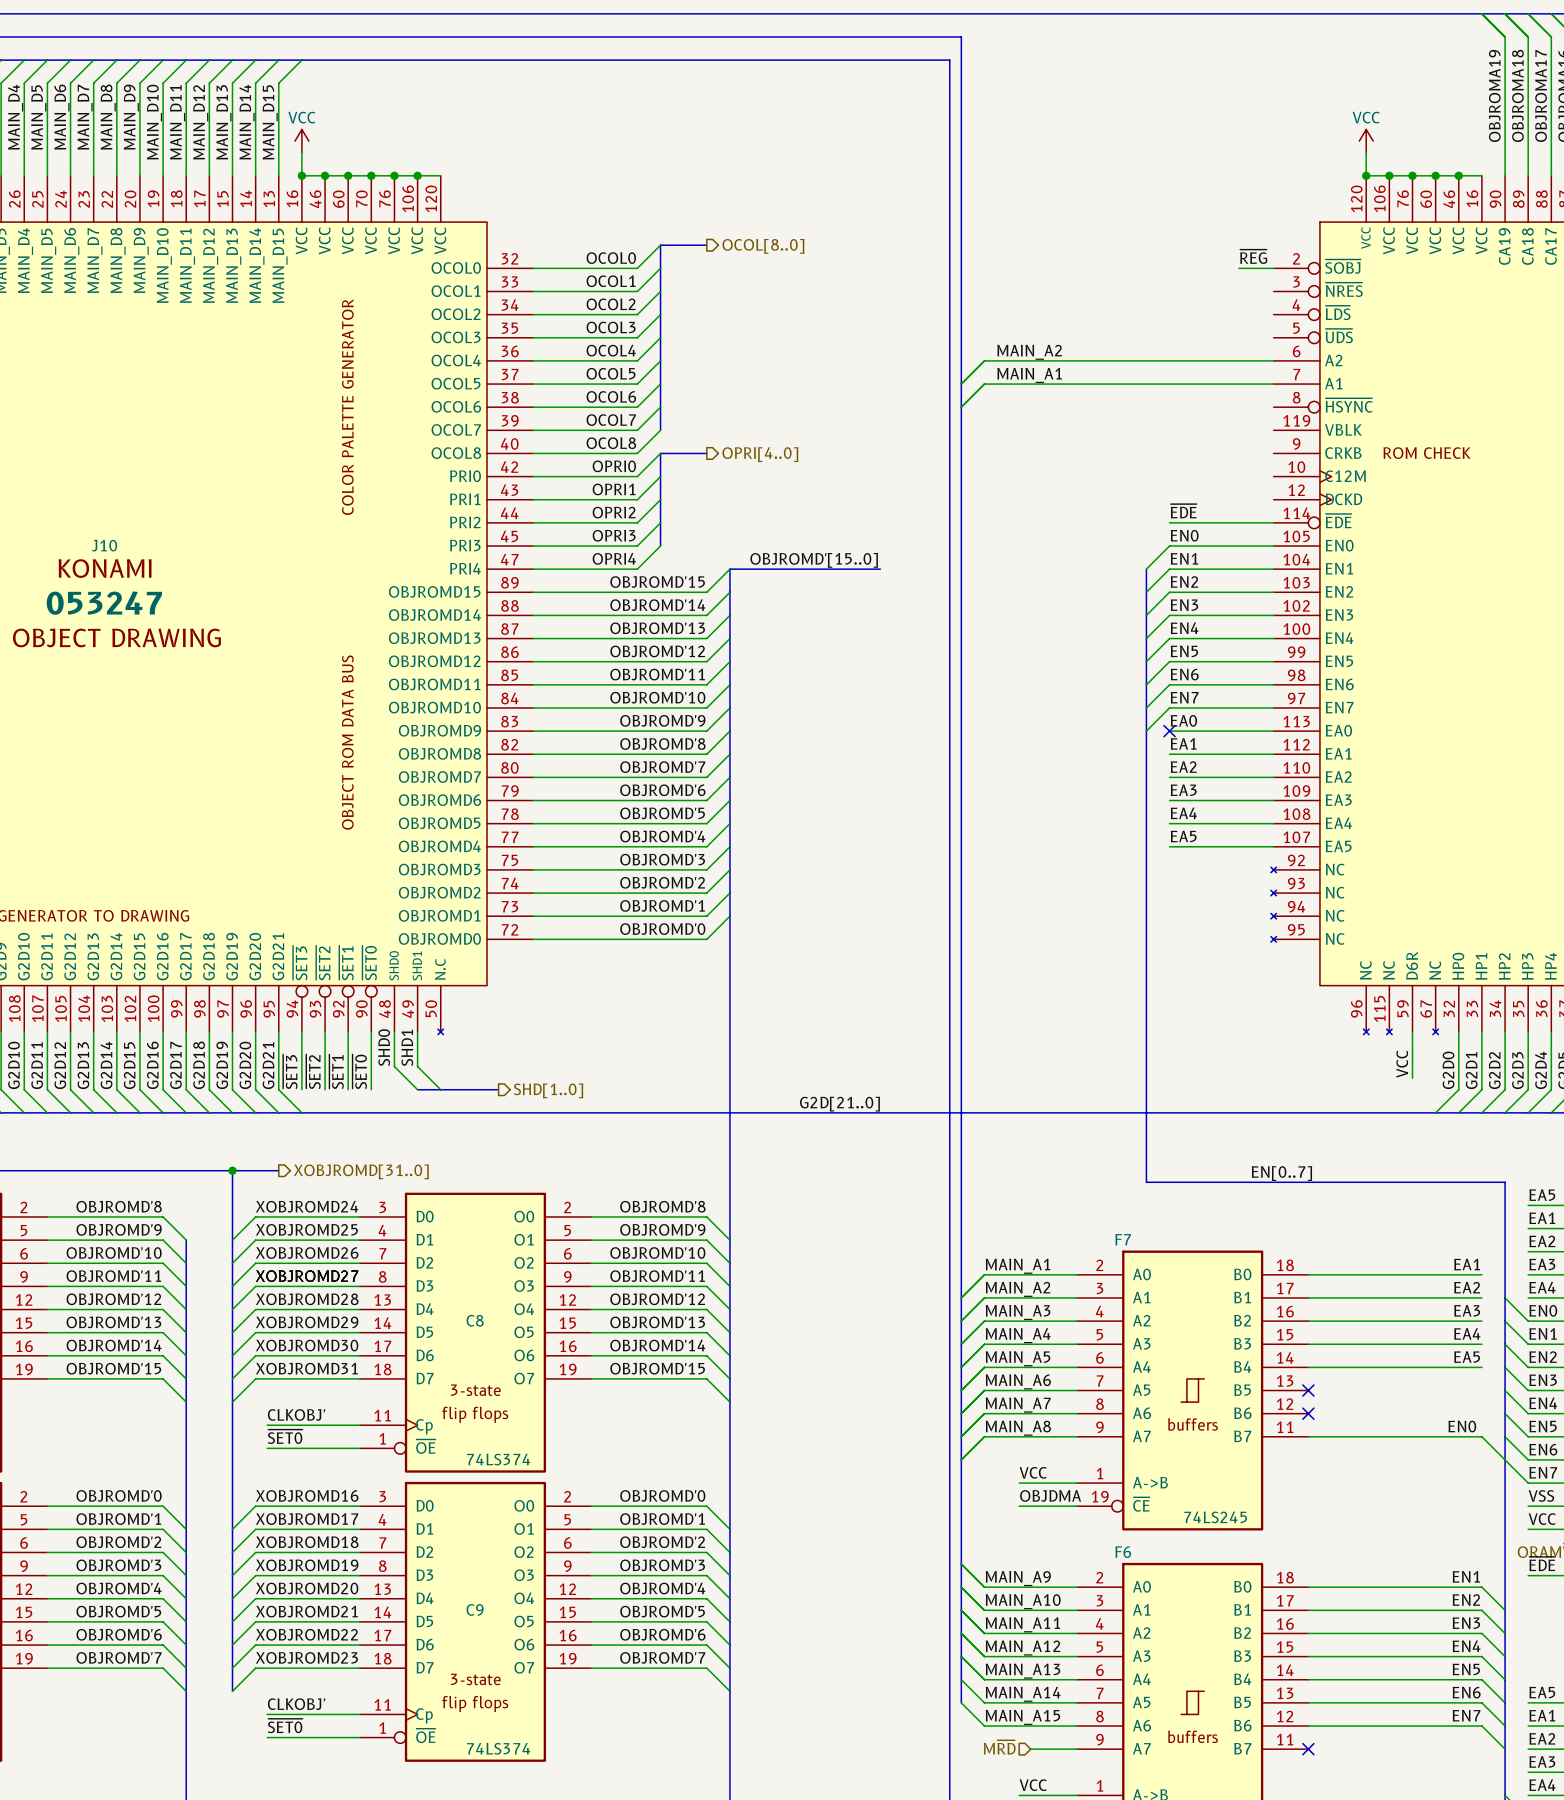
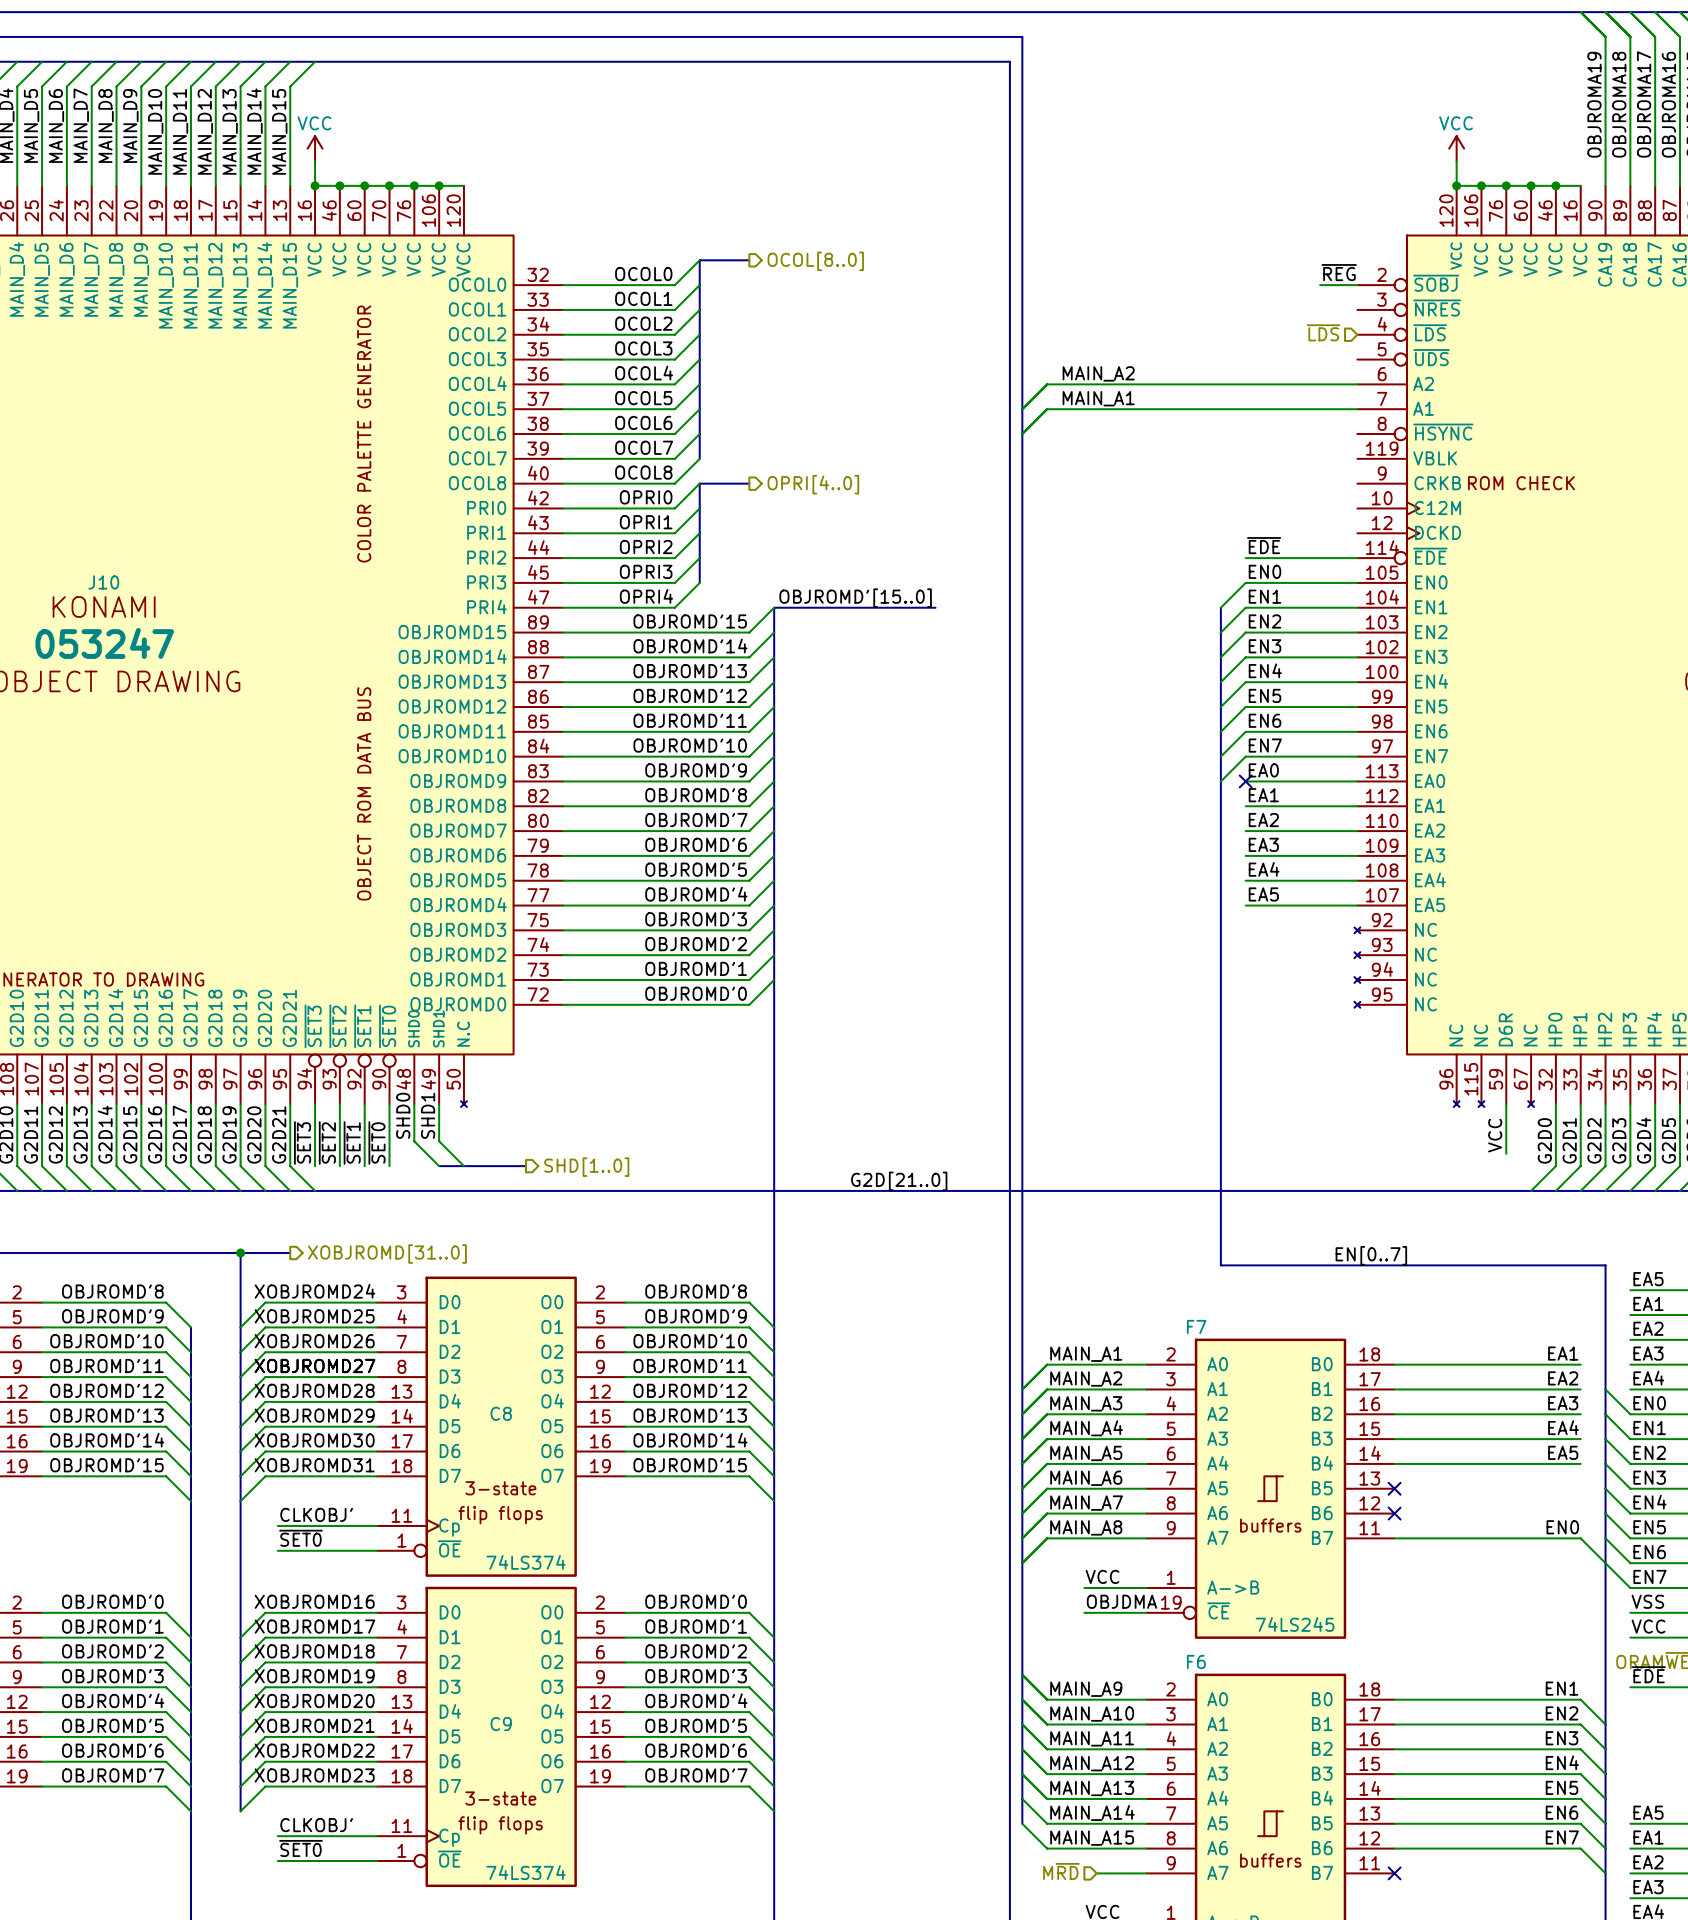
hierarchical label: none -> ~{LDS} (1323, 332)

